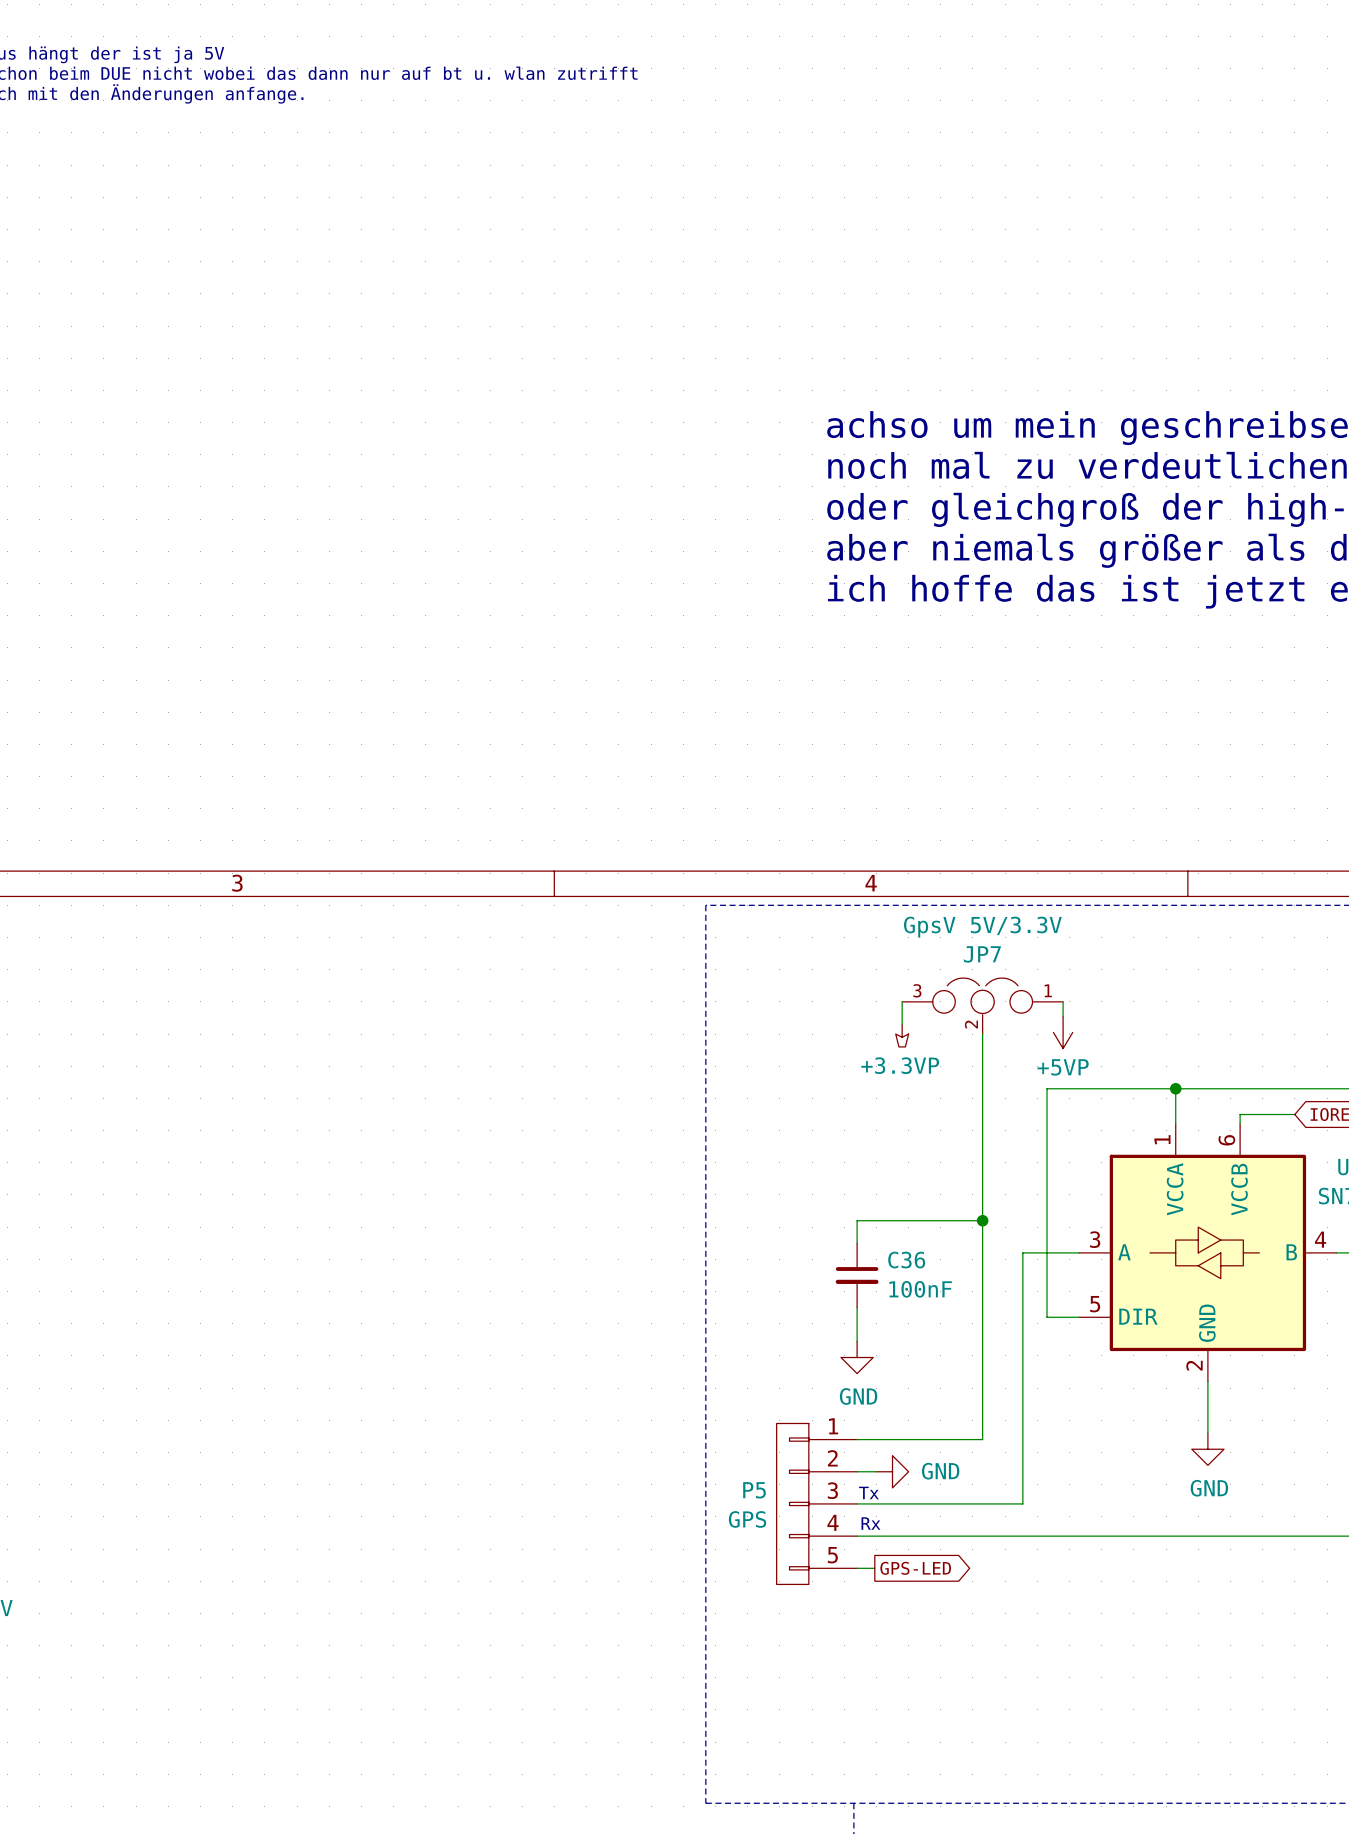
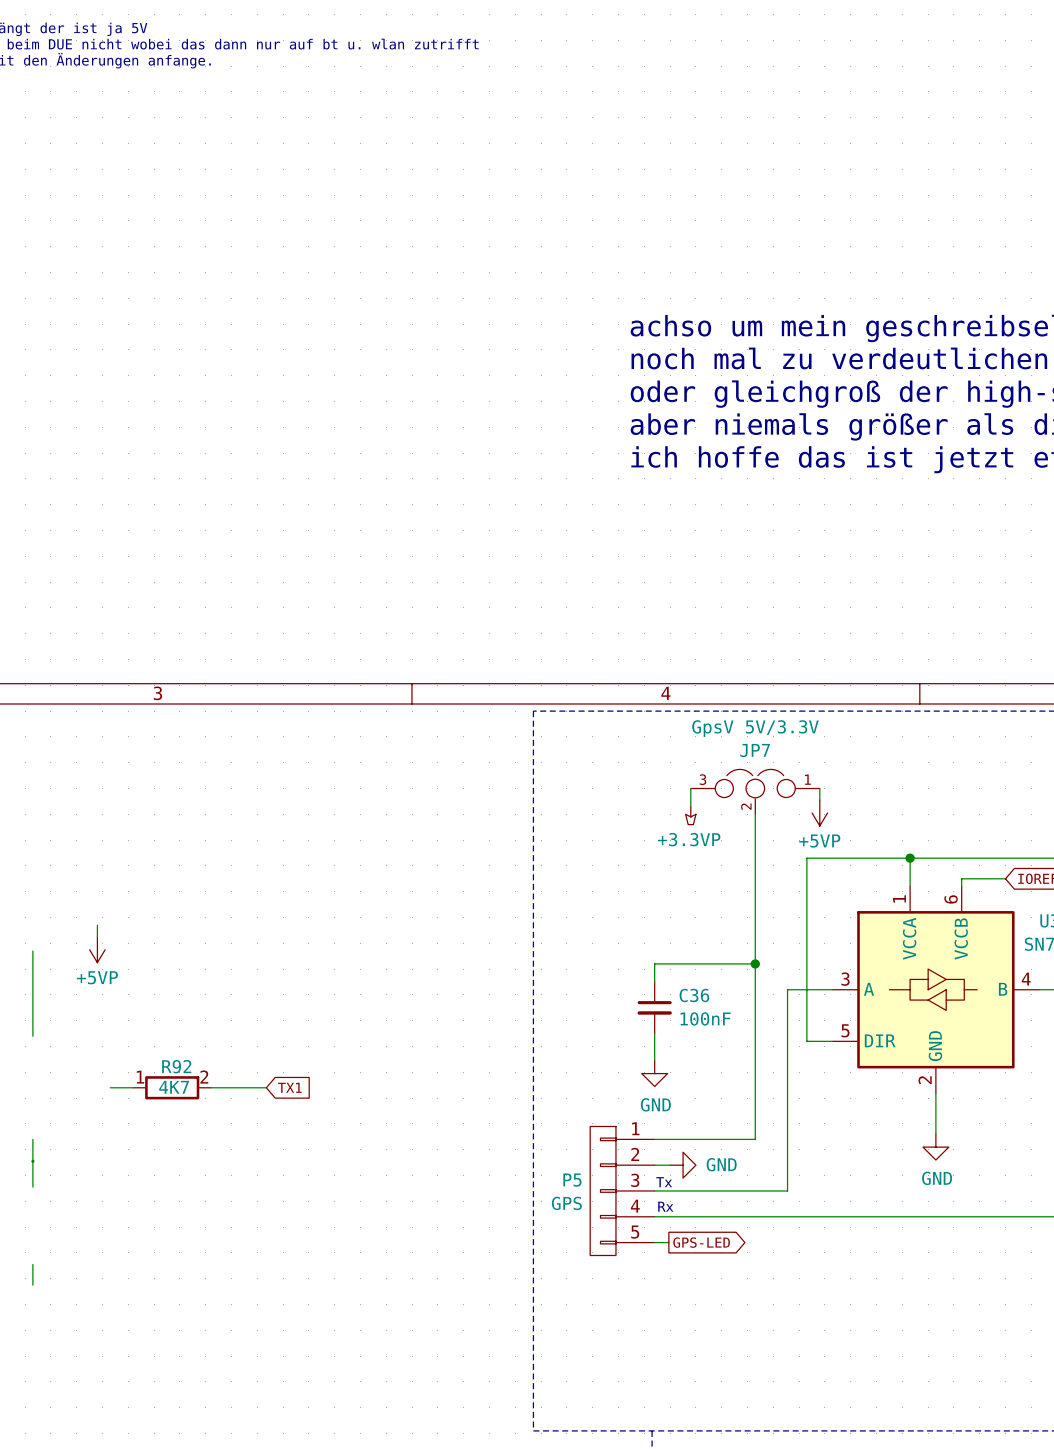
wire: none -> (97, 925) (97, 936)
power symbol: none -> +5VP (97, 949)
wire: none -> (32, 951) (32, 1036)
wire: none -> (110, 1087) (133, 1087)
R92: none -> 4K7 (172, 1087)
wire: none -> (210, 1087) (266, 1087)
global label: none -> TX1 (289, 1087)
wire: none -> (32, 1139) (32, 1187)
junction: none -> (32, 1161)
wire: none -> (32, 1264) (32, 1285)

